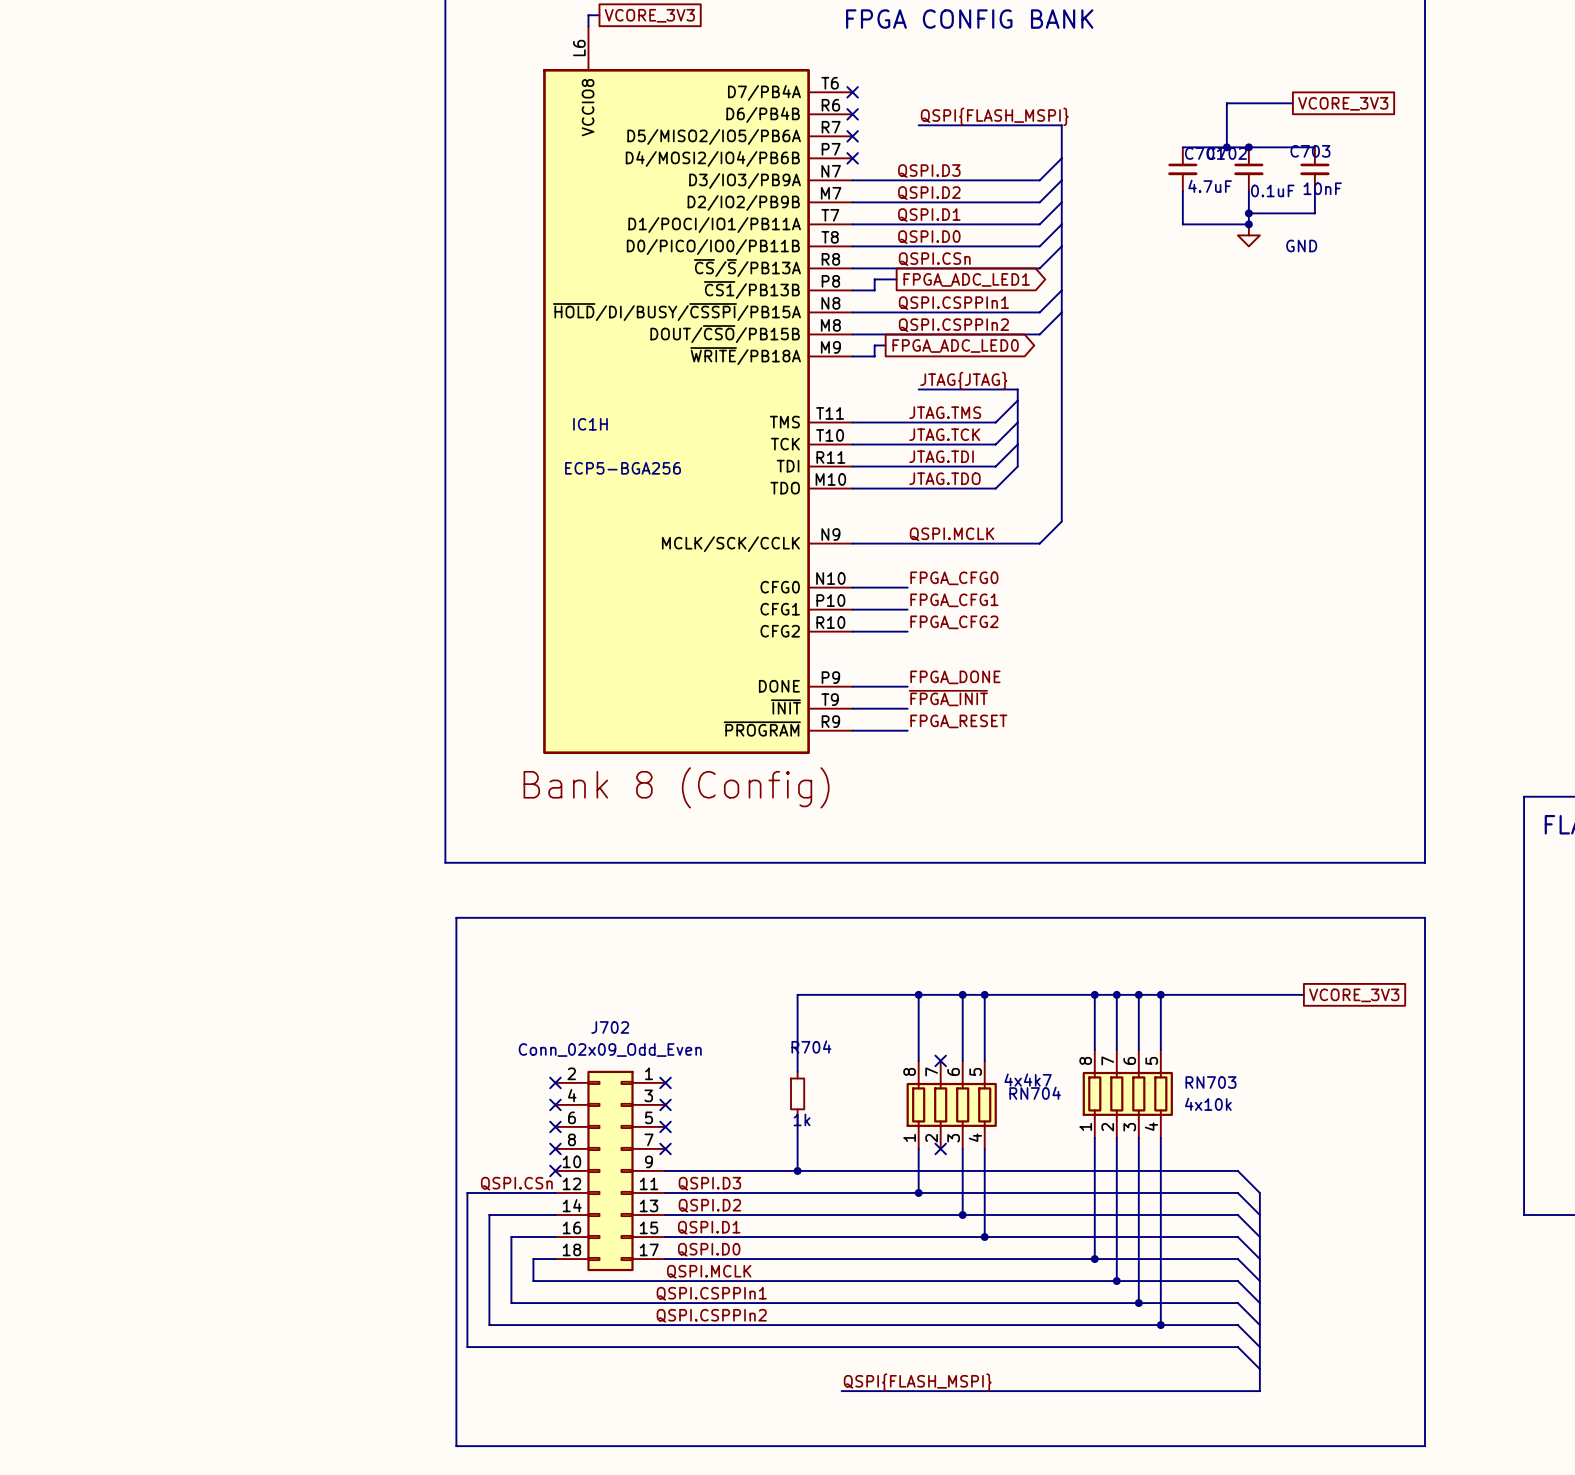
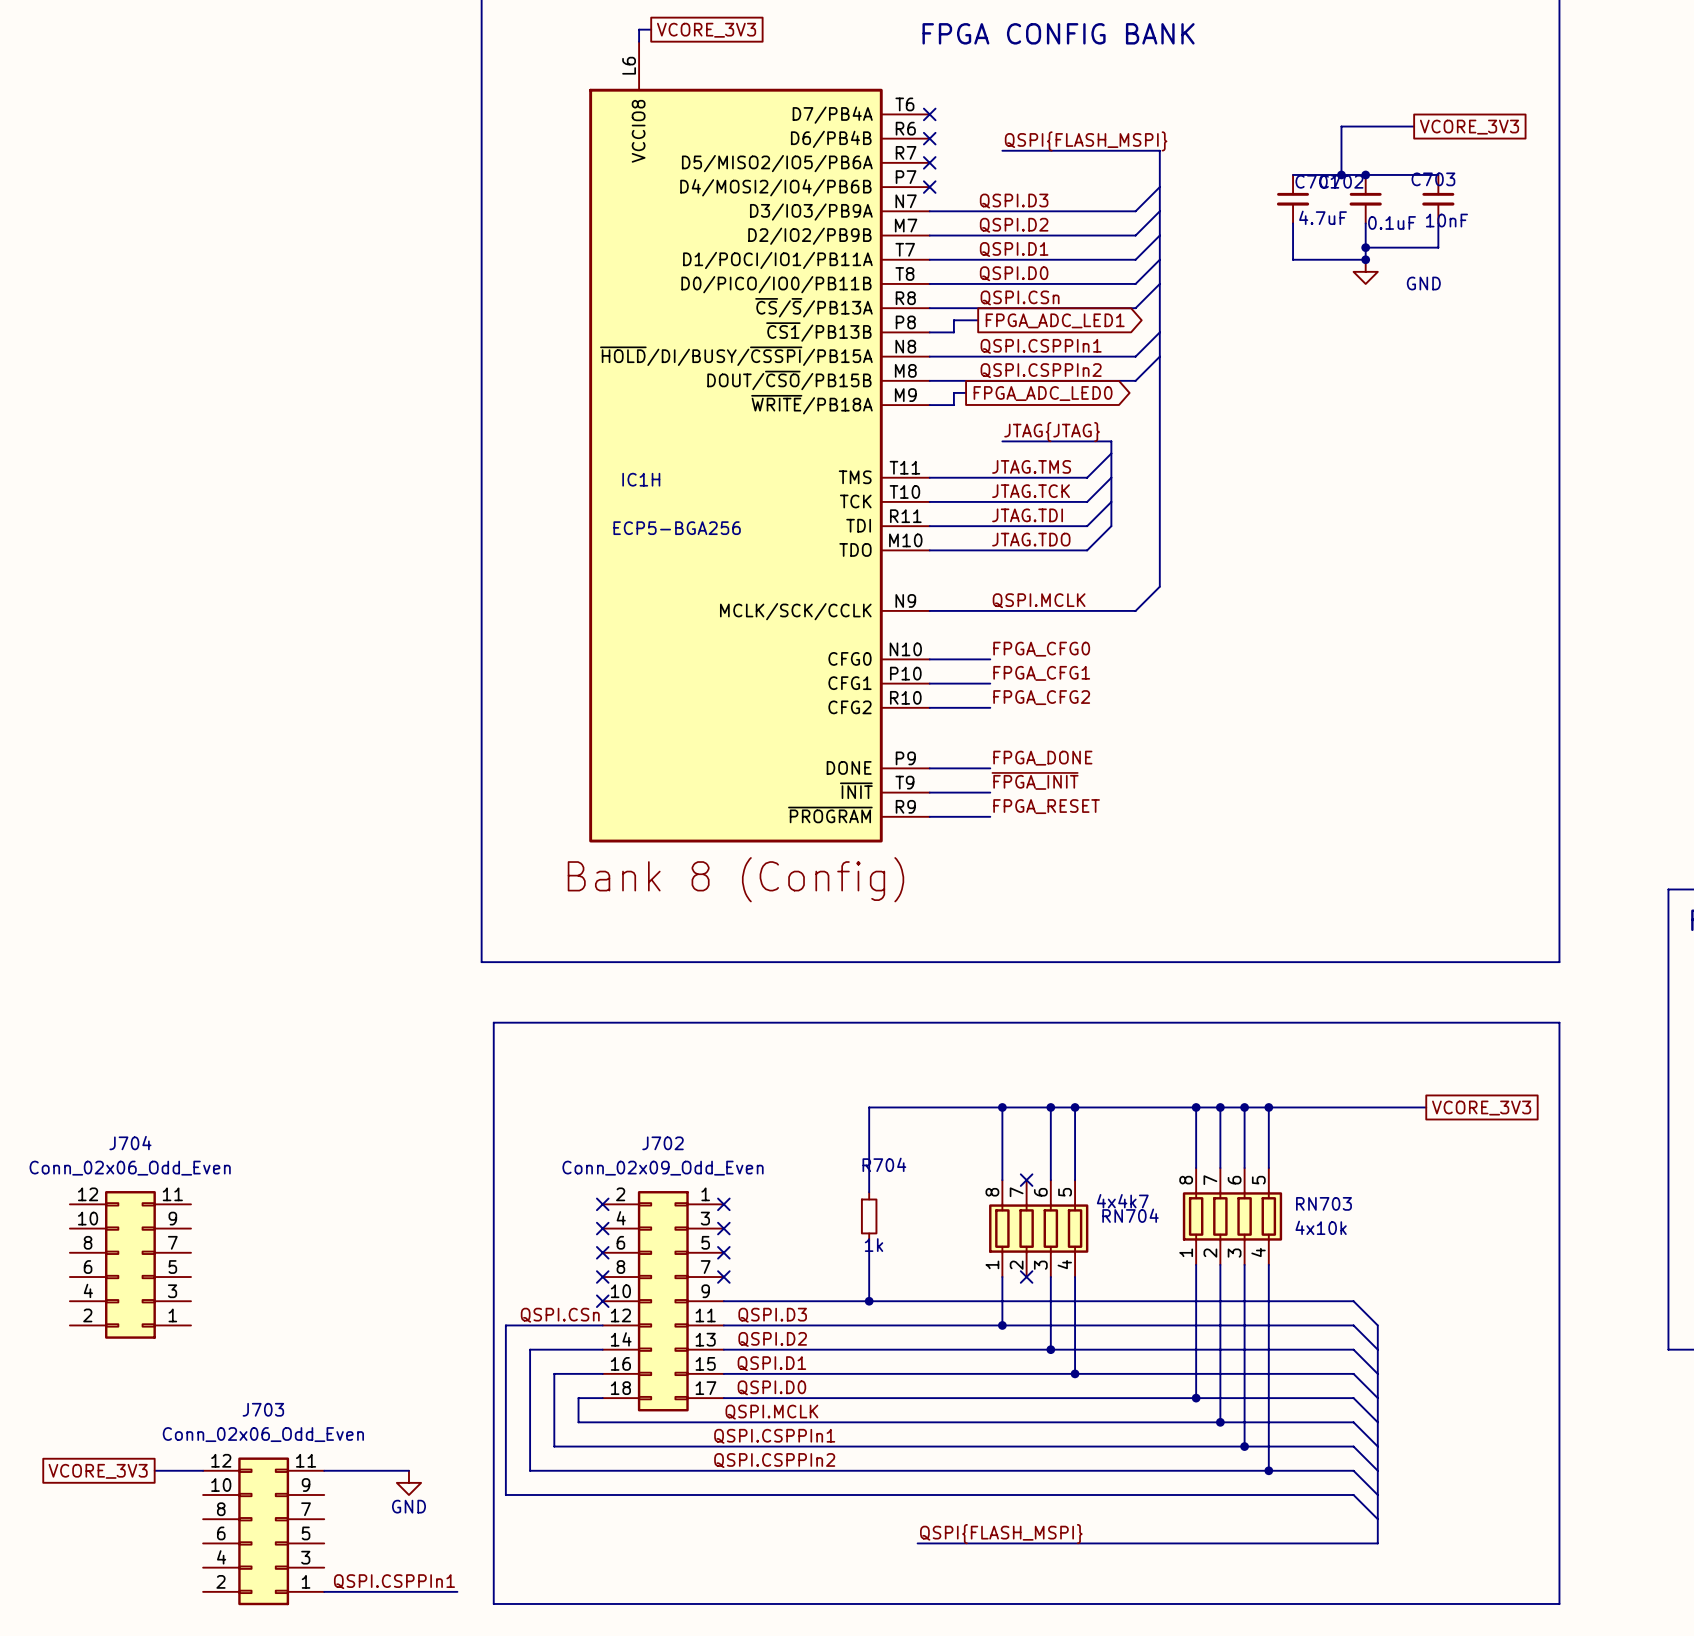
J704: none -> Conn_02x06_Odd_Even (130, 1264)
global label: none -> VCORE_3V3 (98, 1471)
wire: none -> (154, 1470) (203, 1470)
wire: none -> (324, 1470) (408, 1470)
power symbol: none -> GND (408, 1482)
J703: none -> Conn_02x06_Odd_Even (263, 1531)
label: none -> QSPI.CSPPIn1 (394, 1581)
wire: none -> (324, 1591) (457, 1591)

